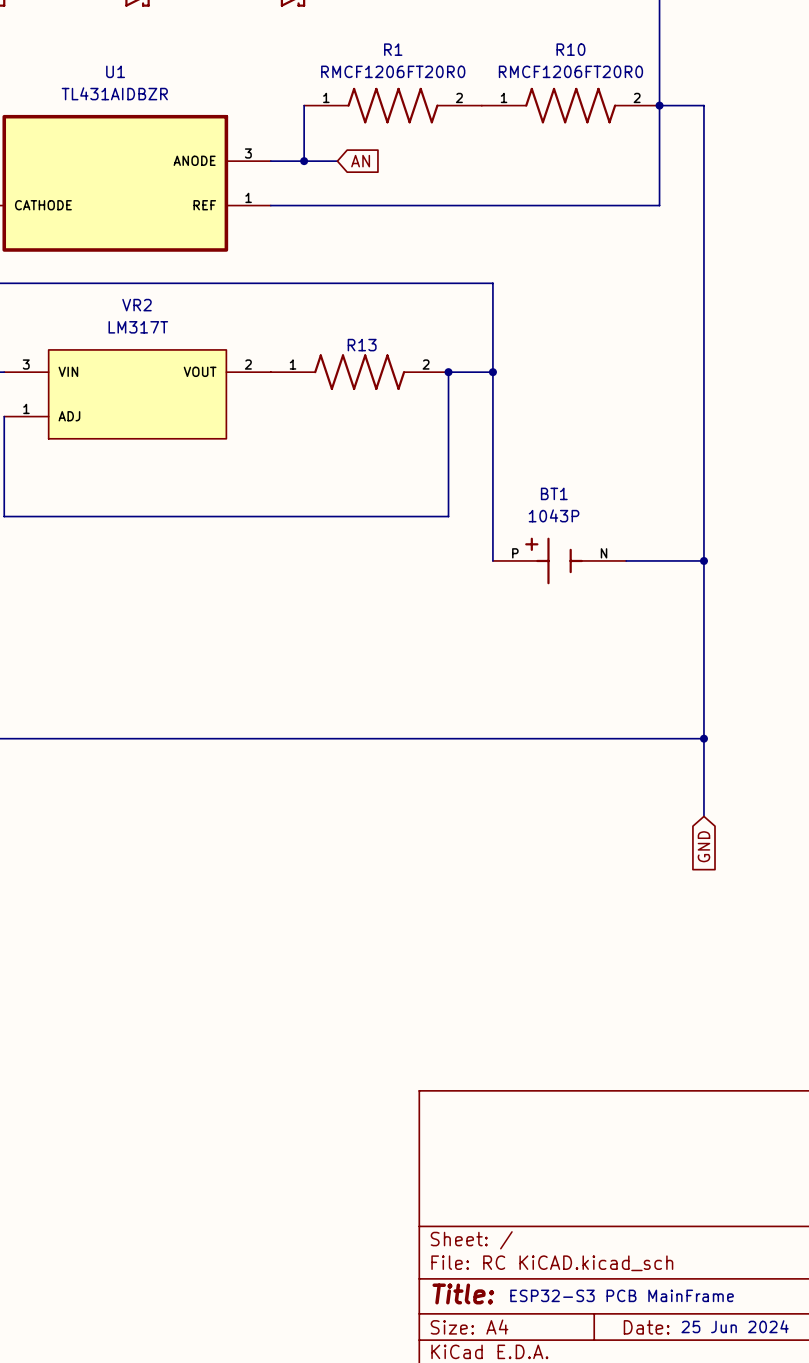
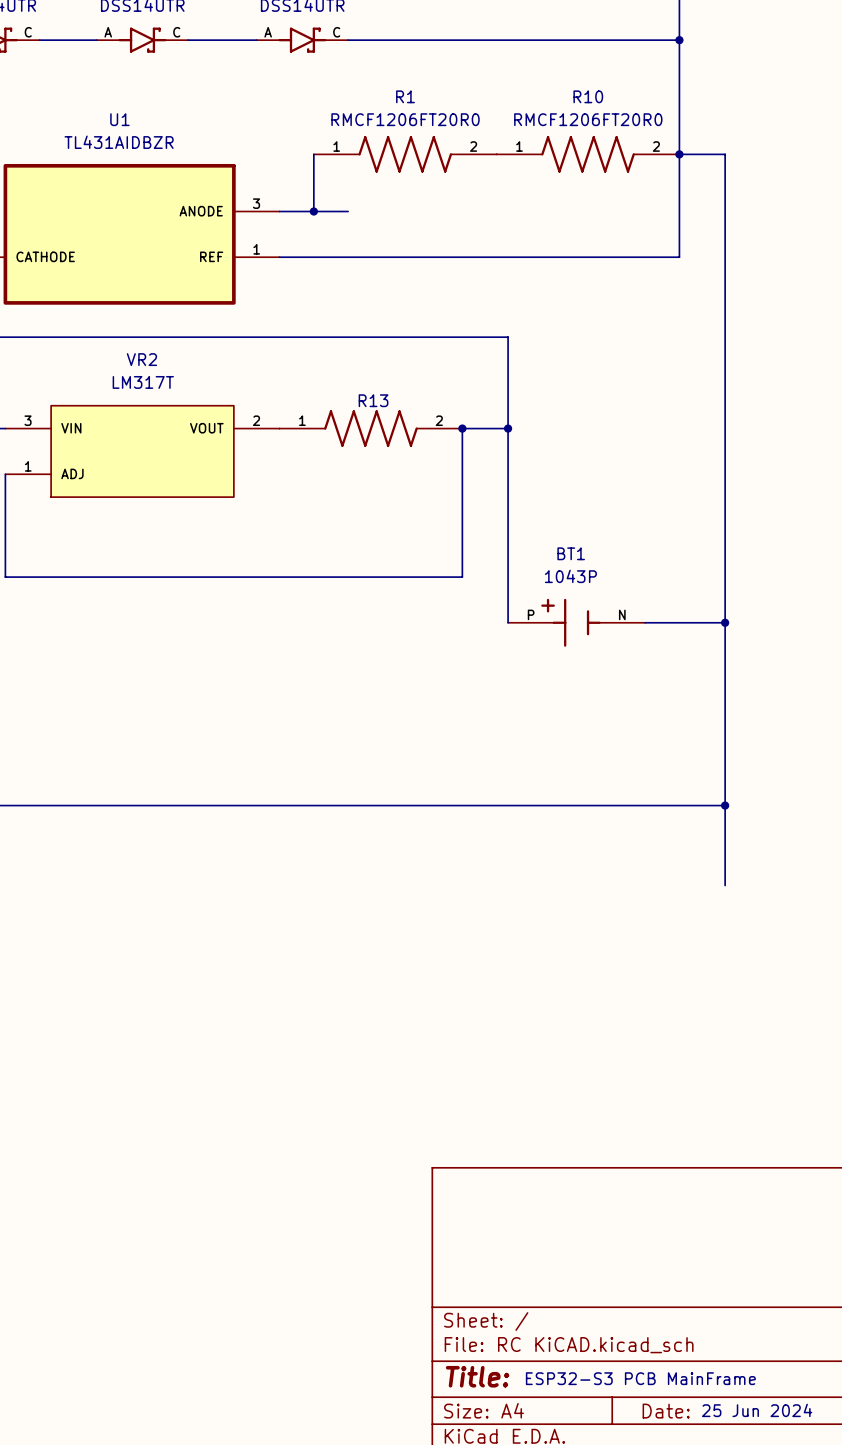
global label: AN (360, 161) -> none
global label: GND (703, 846) -> none

